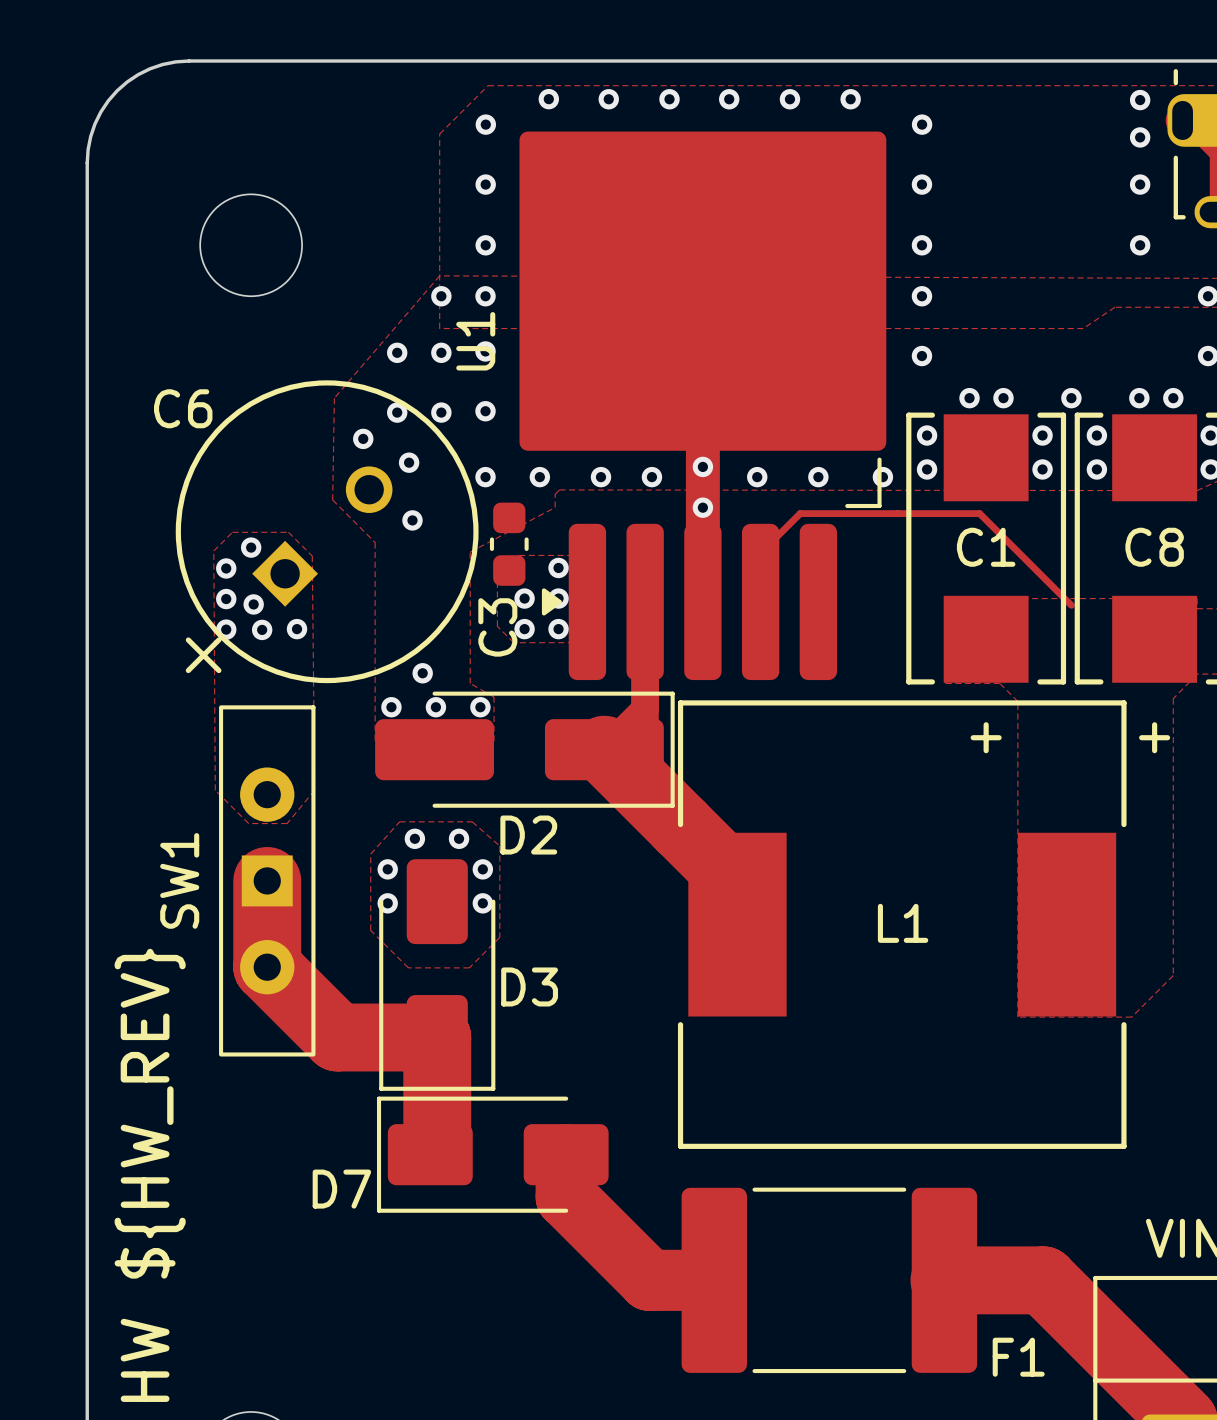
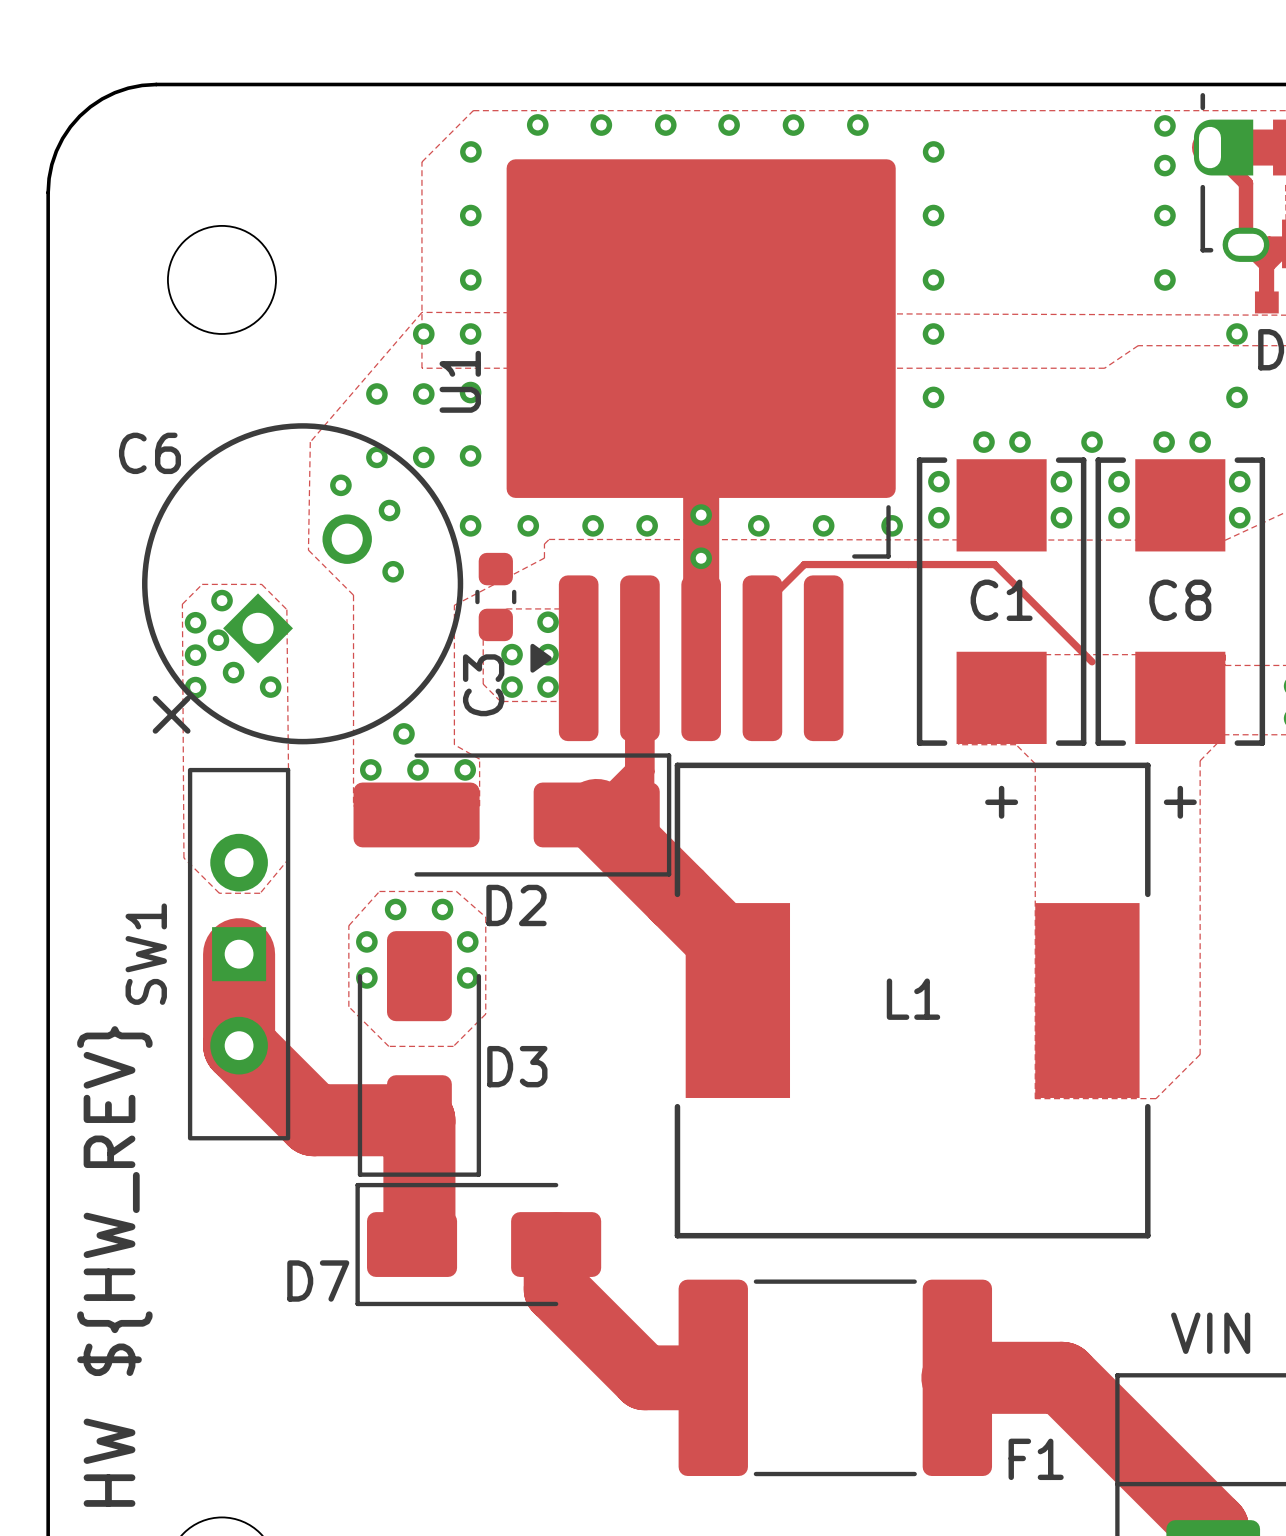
via: none -> (218, 640)
via: (253, 604) -> none
via: none -> (233, 672)
via: (262, 629) -> none

